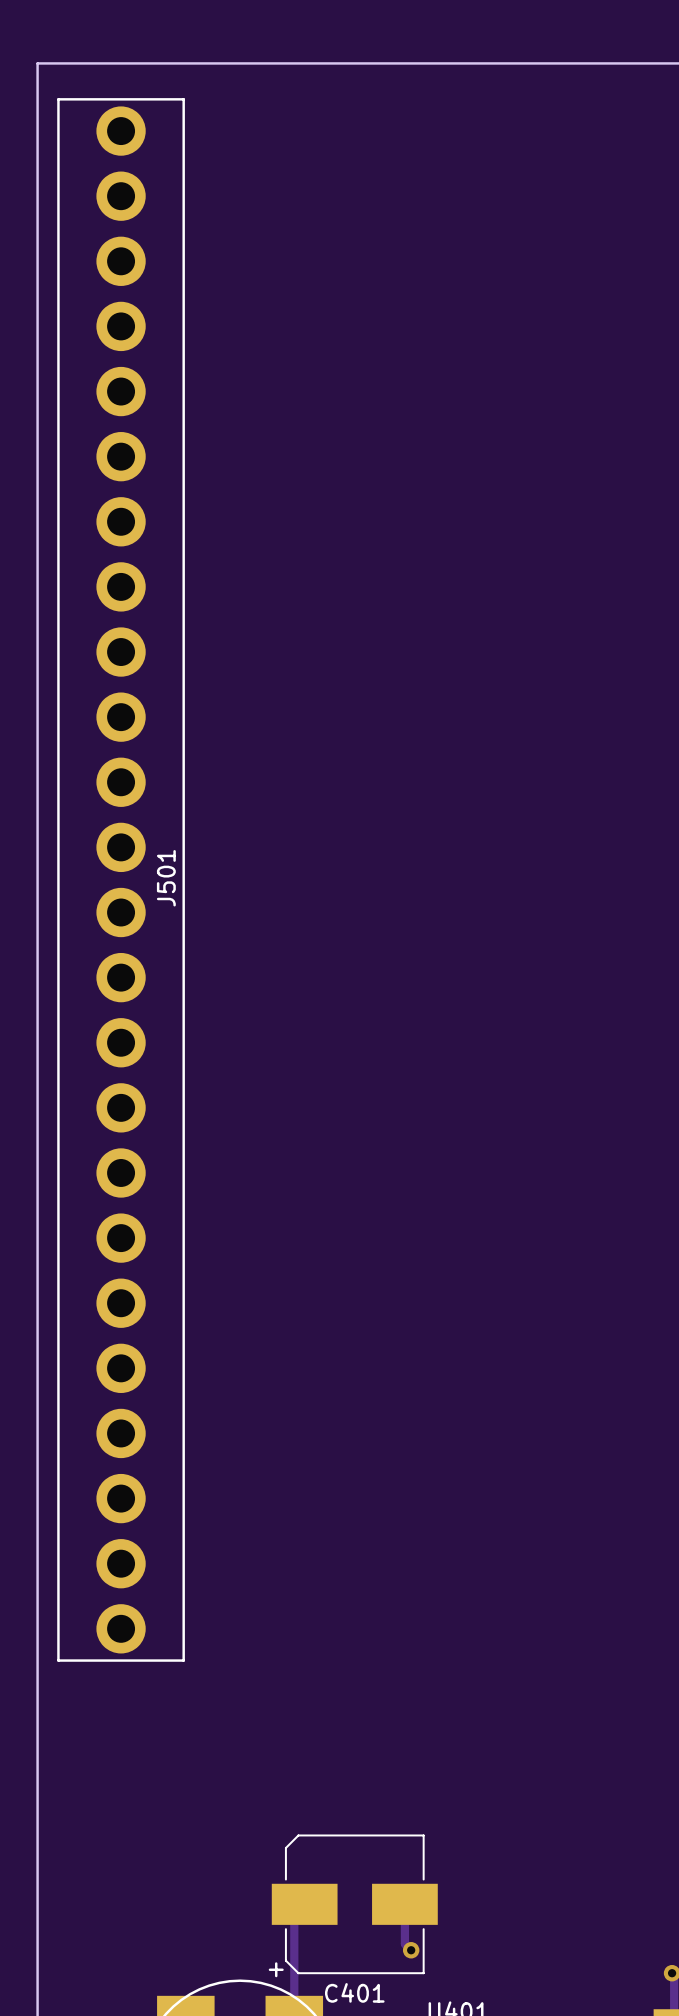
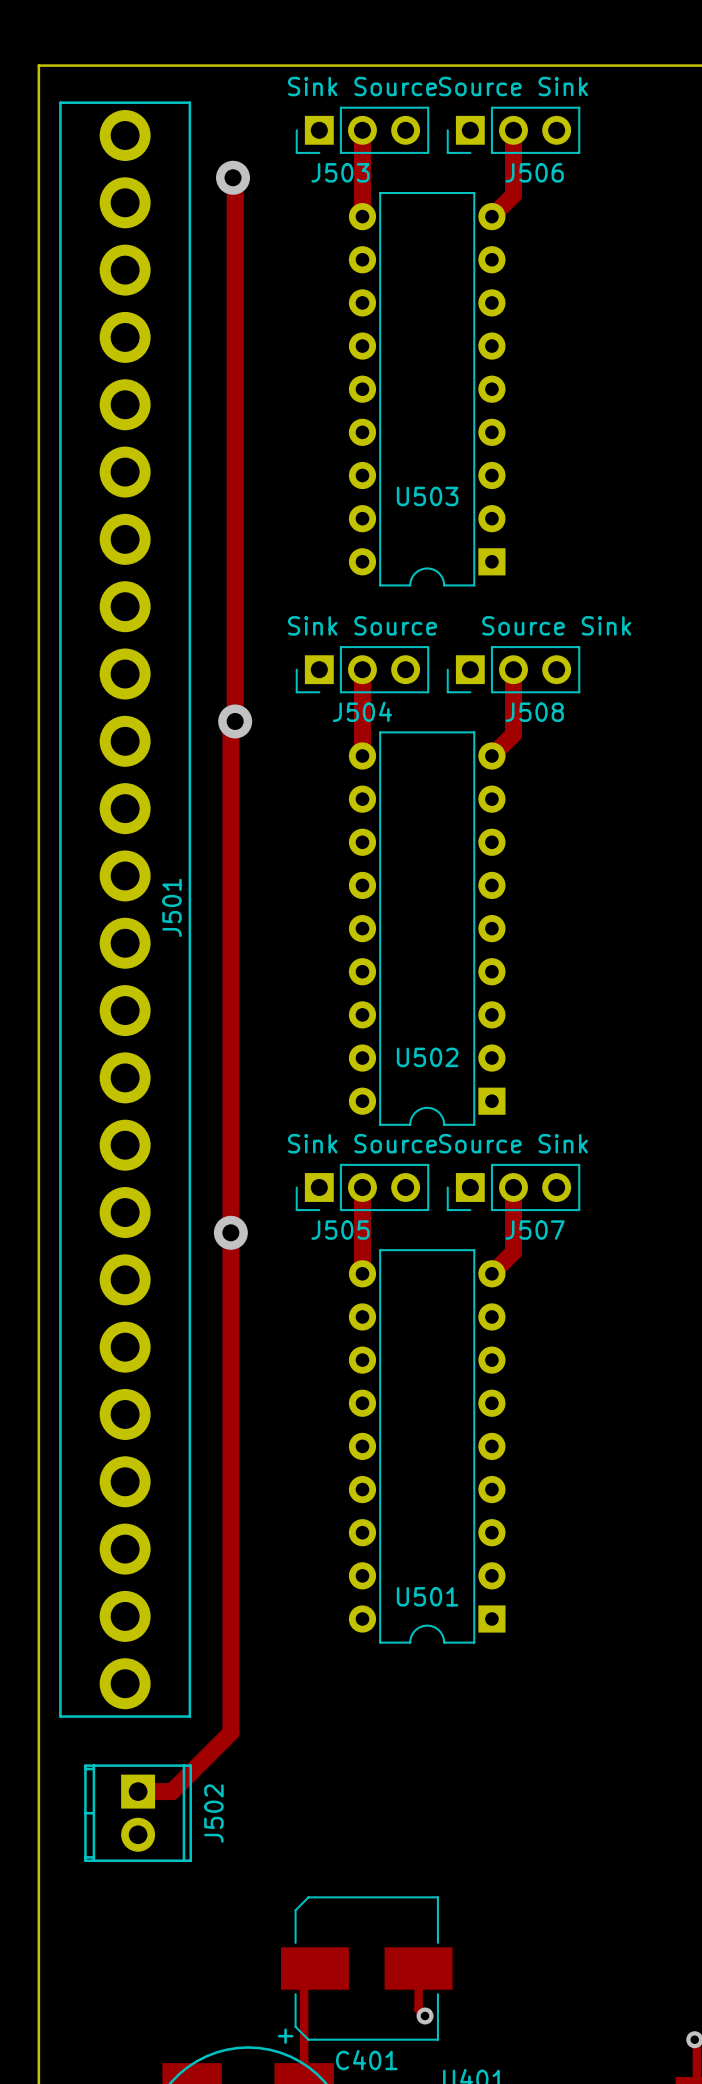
track: none -> (362, 130) (362, 216)
J503: none -> Sink Source (362, 130)
track: none -> (513, 130) (513, 195) (491, 216)
J506: none -> Source Sink (513, 130)
track: none -> (233, 177) (235, 179) (235, 721) (230, 725) (230, 1732) (172, 1791) (138, 1791)
via: none -> (233, 177)
U503: none -> (427, 389)
track: none -> (362, 669) (362, 755)
J504: none -> Sink Source (362, 669)
track: none -> (513, 669) (513, 734) (491, 755)
J508: none -> Source Sink (513, 669)
via: none -> (235, 721)
U502: none -> (427, 928)
track: none -> (362, 1187) (362, 1273)
J505: none -> Sink Source (362, 1187)
track: none -> (513, 1187) (513, 1252) (491, 1273)
J507: none -> Source Sink (513, 1187)
via: none -> (230, 1232)
U501: none -> (427, 1446)
J502: none -> (138, 1813)

